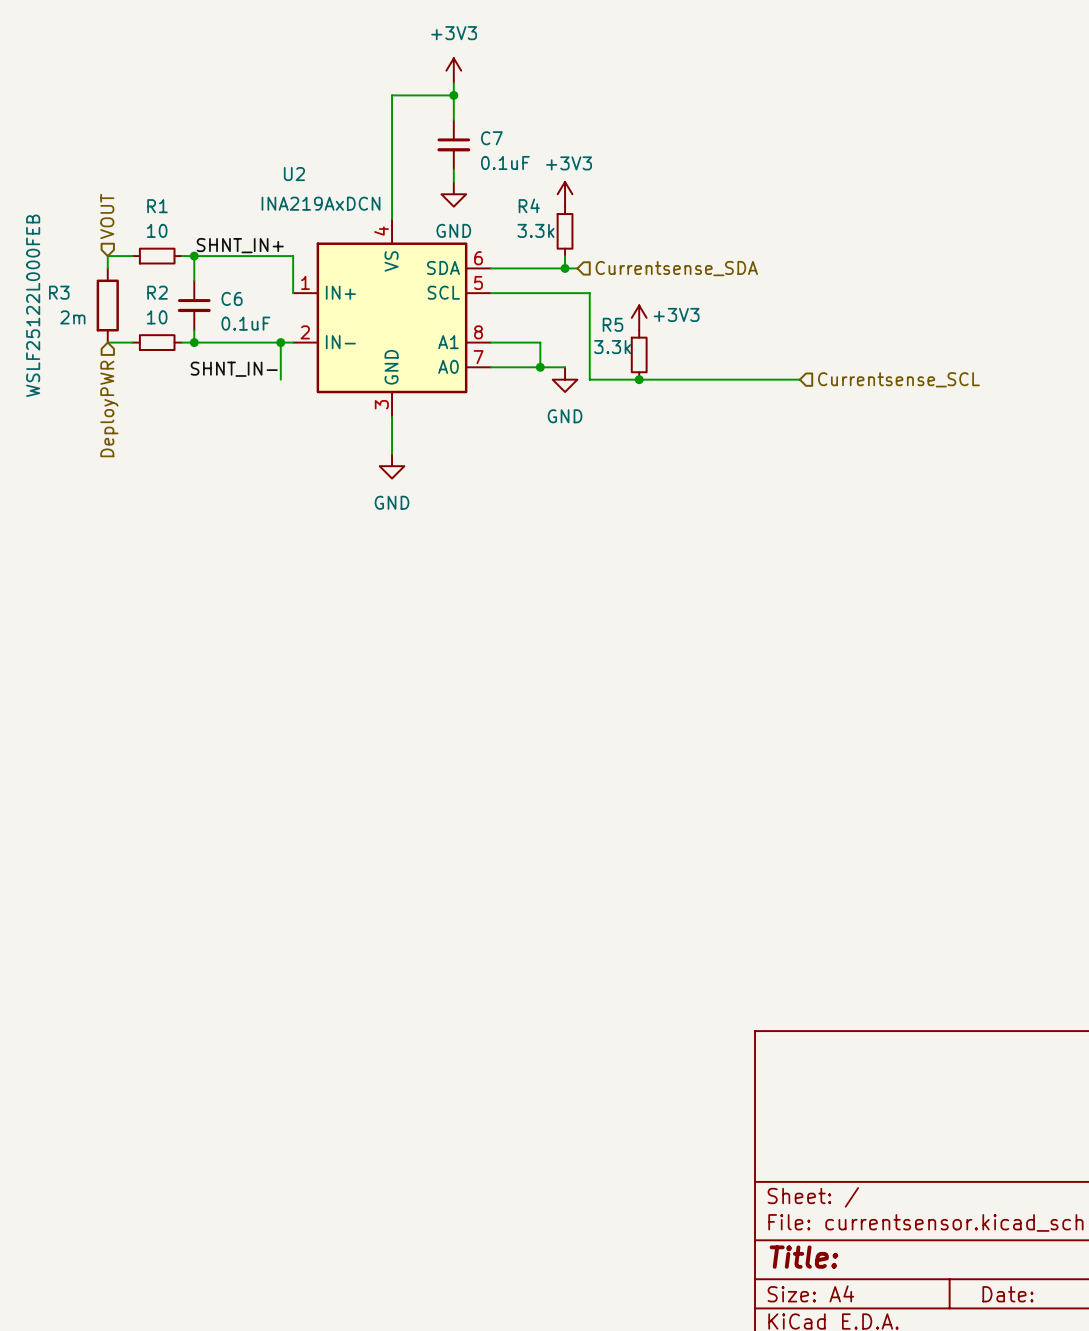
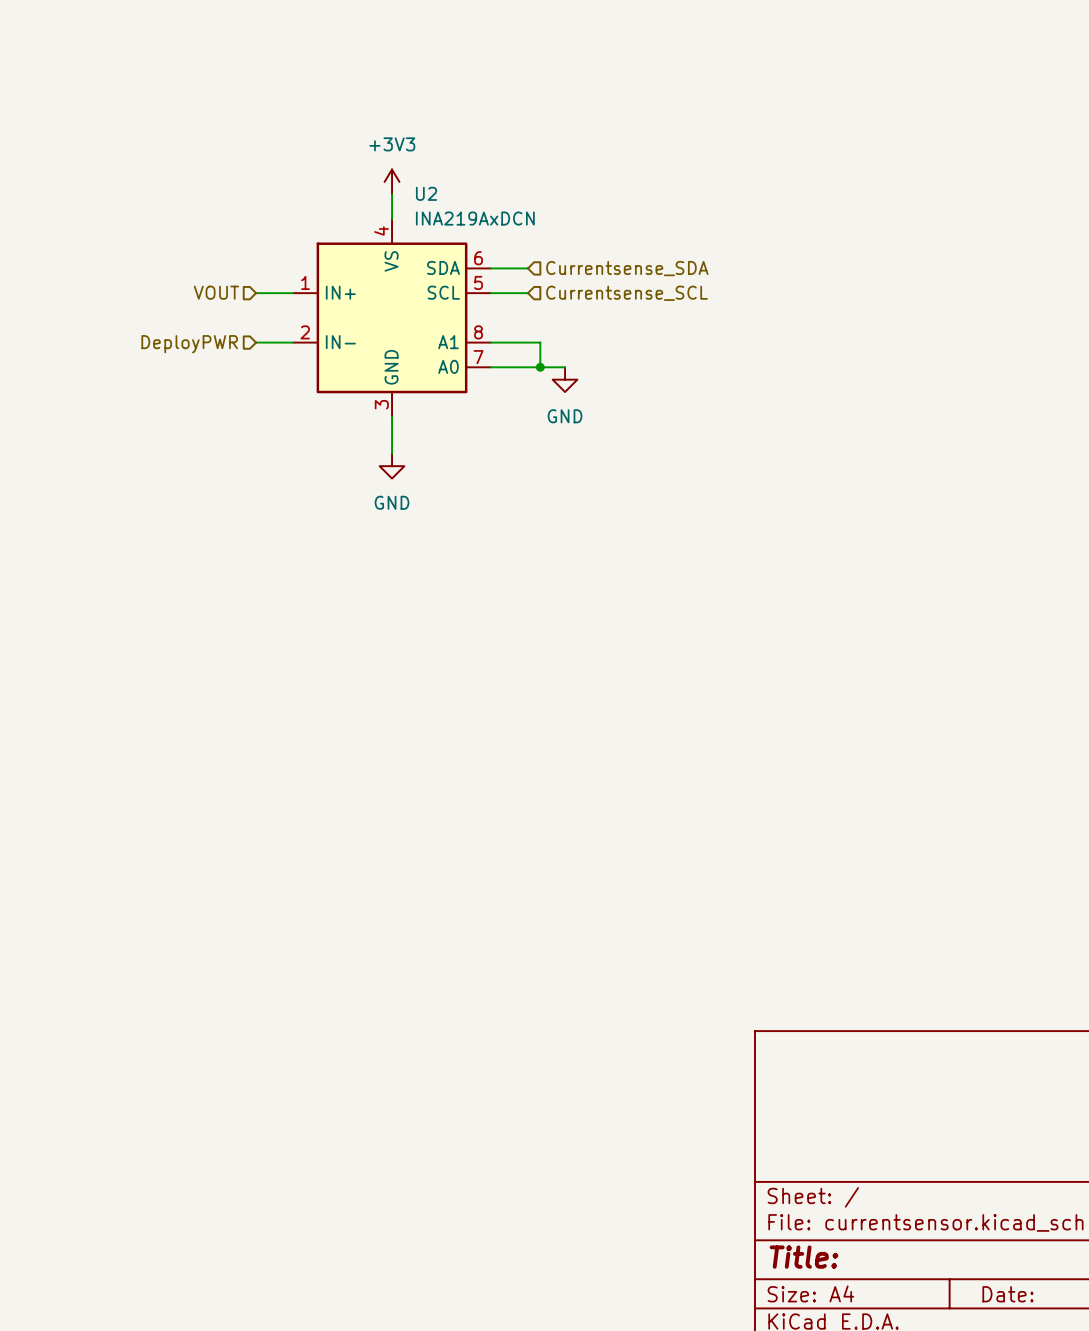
power symbol: +3V3 (453, 70) -> none
wire: (453, 83) (453, 120) -> none
wire: (453, 95) (392, 95) (392, 194) -> none
junction: (453, 95) -> none
C7: 0.1uF (453, 144) -> none
wire: (453, 169) (453, 181) -> none
U2 name position: U2 (294, 174) -> U2 (426, 193)
power symbol: none -> +3V3 (392, 181)
power symbol: GND (453, 194) -> none
power symbol: +3V3 (565, 194) -> none
U2 value position: INA219AxDCN (321, 203) -> INA219AxDCN (475, 218)
hierarchical label rotation: 0° (107, 216) -> 90° counterclockwise (216, 292)
hierarchical label position: VOUT (107, 216) -> VOUT (216, 292)
R4: 3.3k (565, 231) -> none
label: SHNT_IN+ (240, 245) -> none
wire: (132, 256) (107, 256) (107, 268) -> none
R1: 10 (157, 256) -> none
wire: (181, 256) (293, 256) (293, 293) -> (256, 293) (293, 293)
wire: (194, 256) (194, 280) -> none
junction: (194, 256) -> none
wire: (565, 256) (565, 268) -> none
wire: (527, 268) (577, 268) -> none
junction: (565, 268) -> none
hierarchical label position: Currentsense_SDA (676, 268) -> Currentsense_SDA (627, 268)
wire: (527, 293) (589, 293) (589, 379) (799, 379) -> none
hierarchical label: none -> Currentsense_SCL (627, 293)
R3: 2m (107, 305) -> none
C6: 0.1uF (194, 305) -> none
power symbol: +3V3 (639, 317) -> none
wire: (194, 330) (194, 342) -> none
wire: (107, 342) (132, 342) -> none
R2: 10 (157, 342) -> none
wire: (181, 342) (256, 342) -> none
junction: (194, 342) -> none
wire: (280, 342) (280, 379) -> none
junction: (280, 342) -> none
R5: 3.3k (639, 354) -> none
label: SHNT_IN- (234, 369) -> none
junction: (639, 379) -> none
hierarchical label: Currentsense_SCL (898, 379) -> none
hierarchical label rotation: 0° (109, 408) -> 90° clockwise (189, 344)

